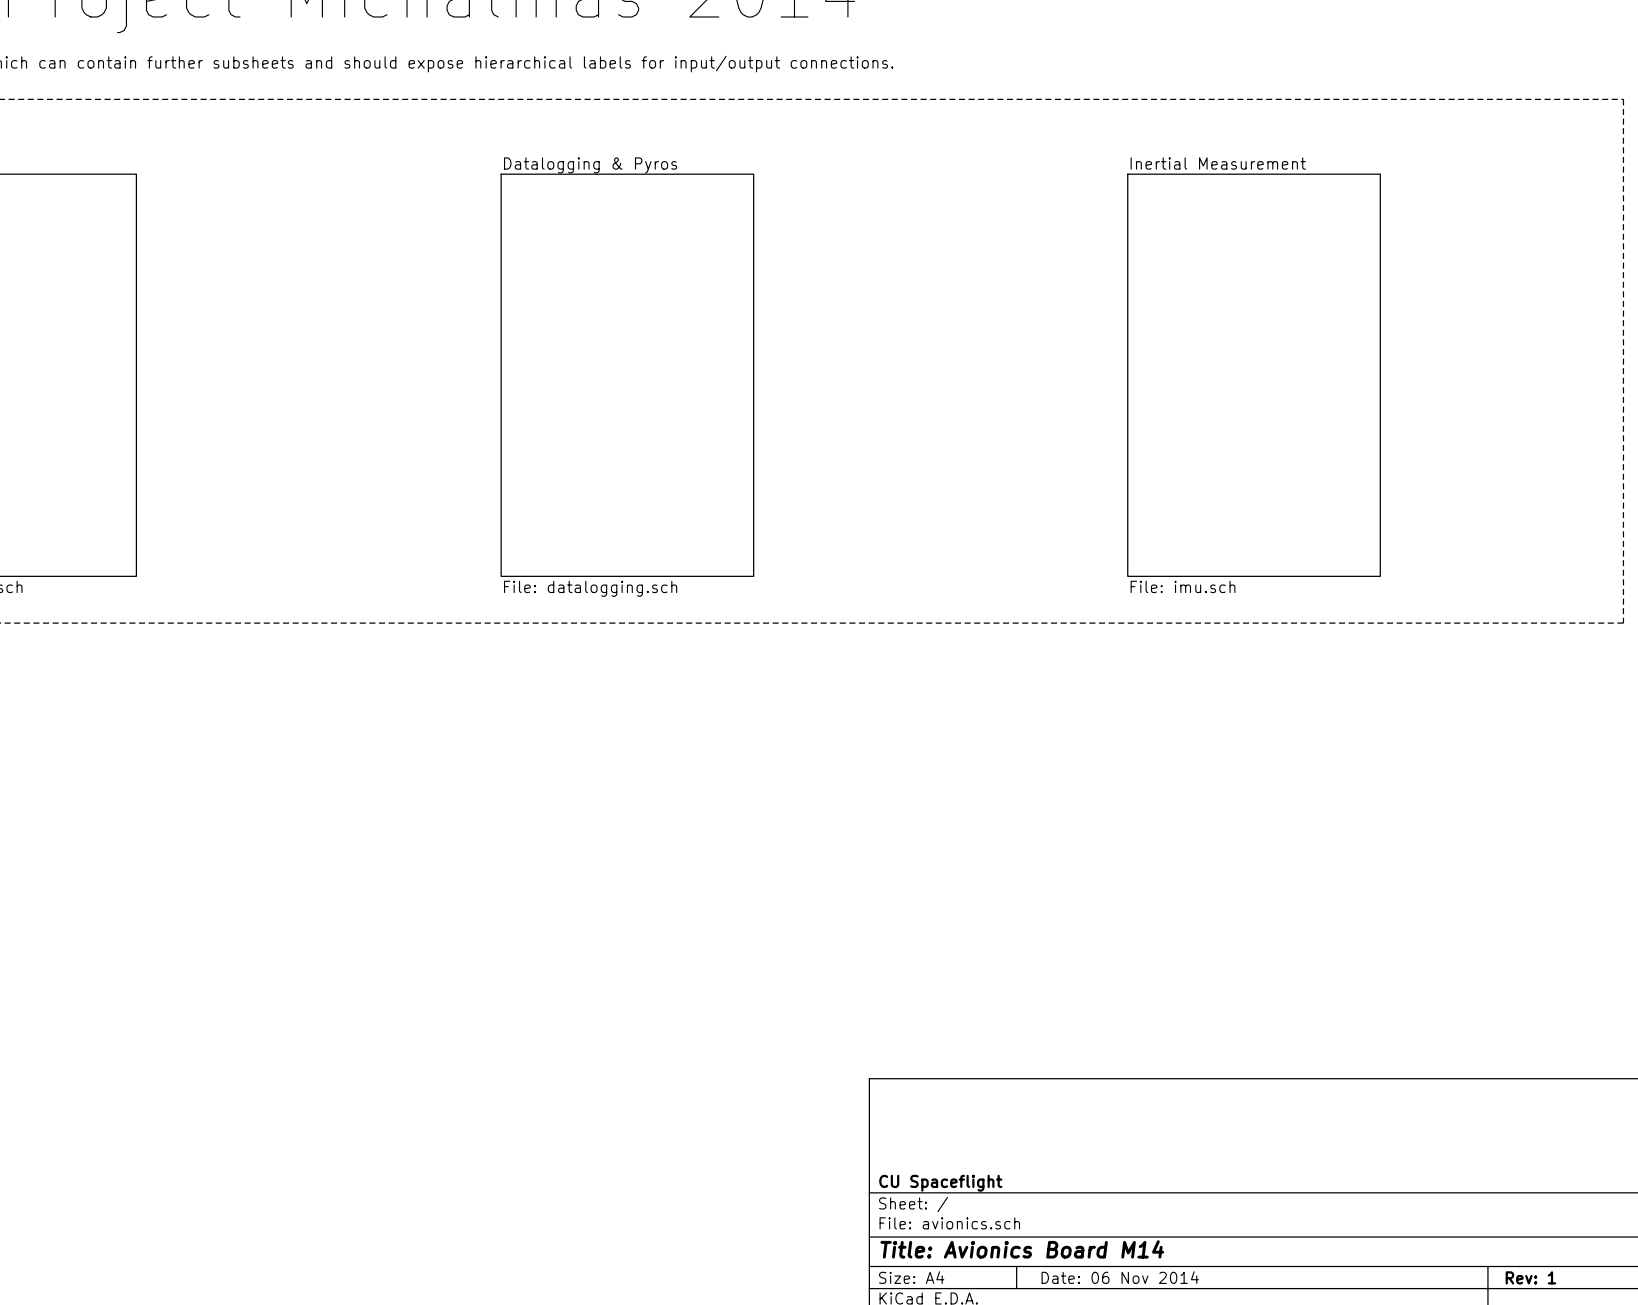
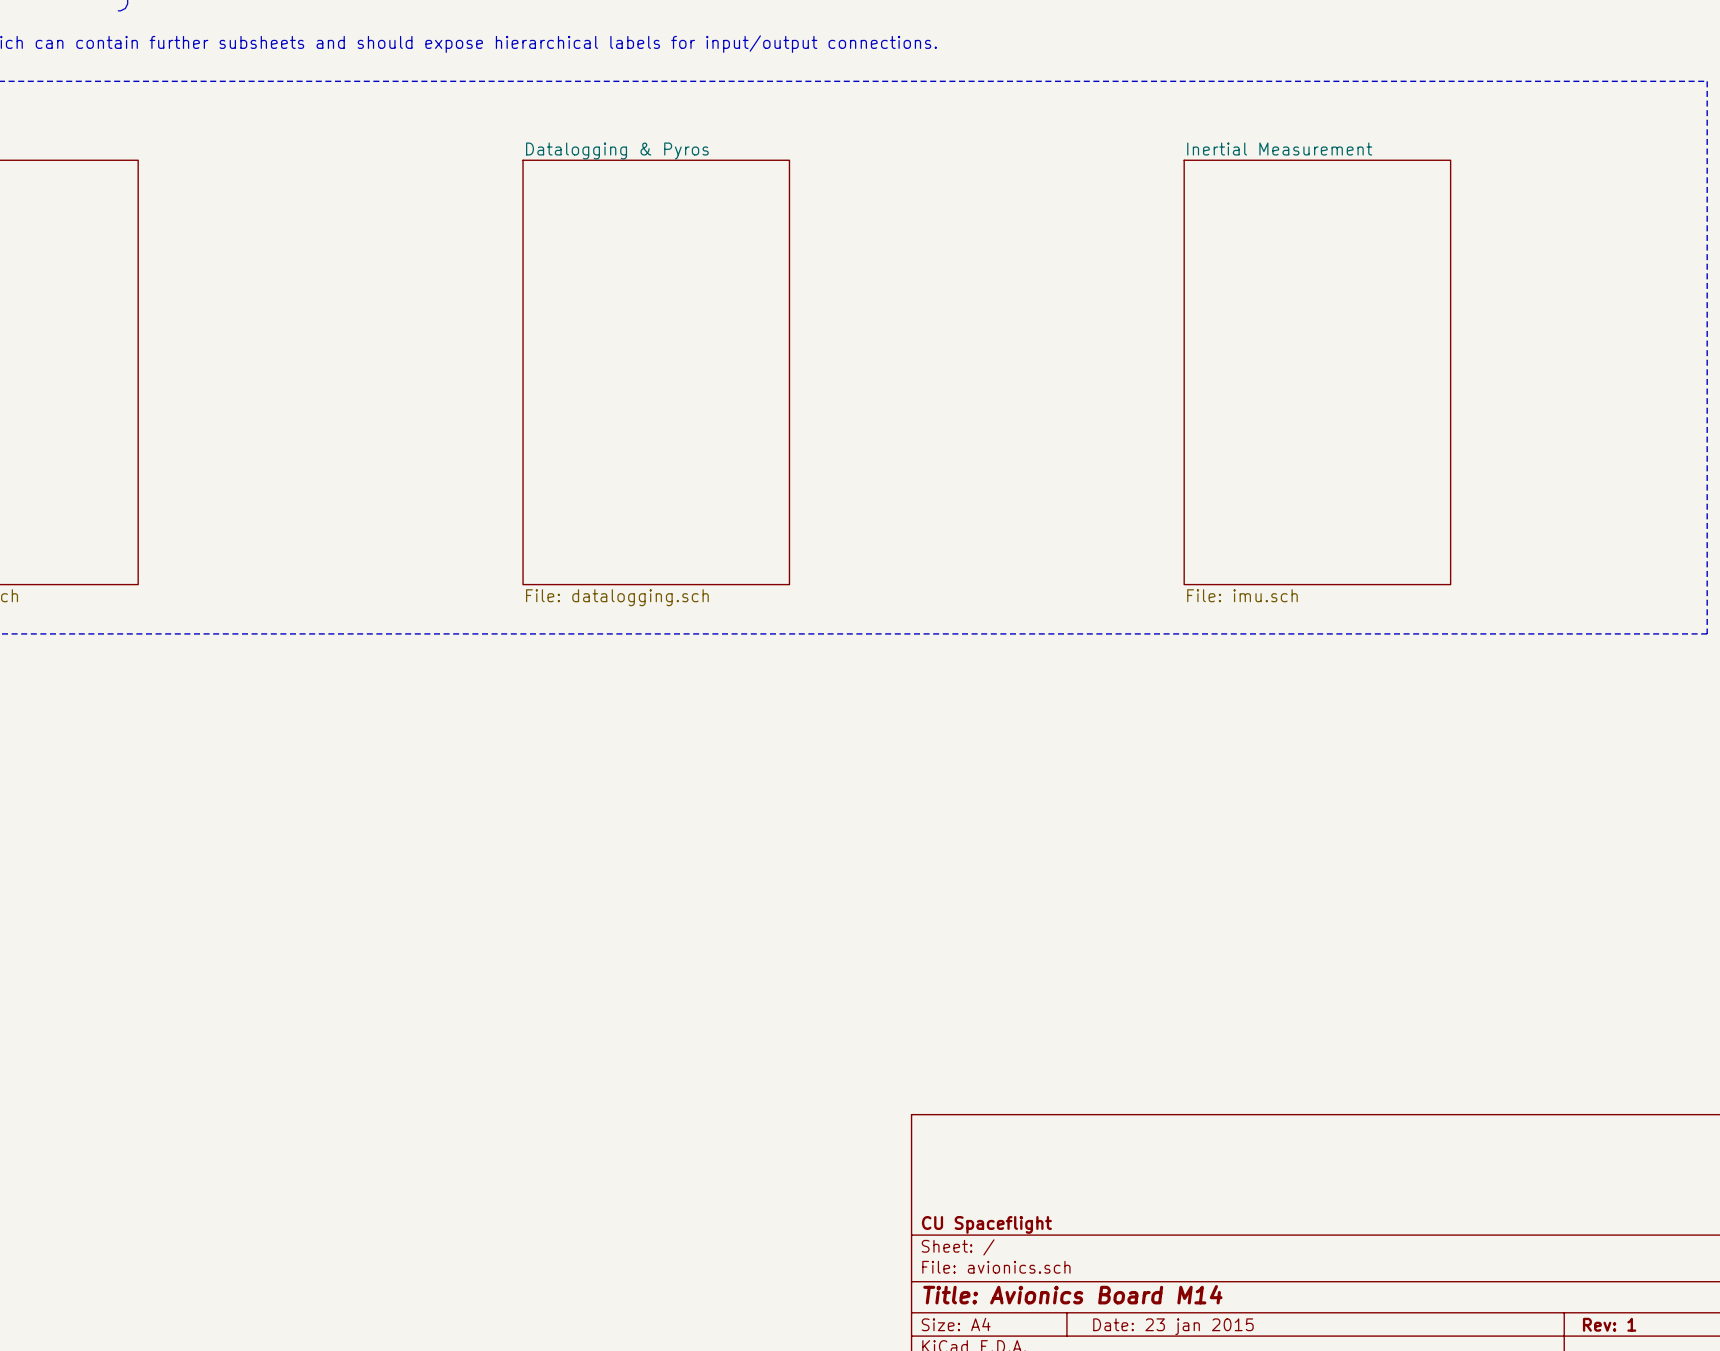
title block: Date: 06 Nov 2014 (1120, 1277) -> Date: 23 jan 2015 (1173, 1326)

